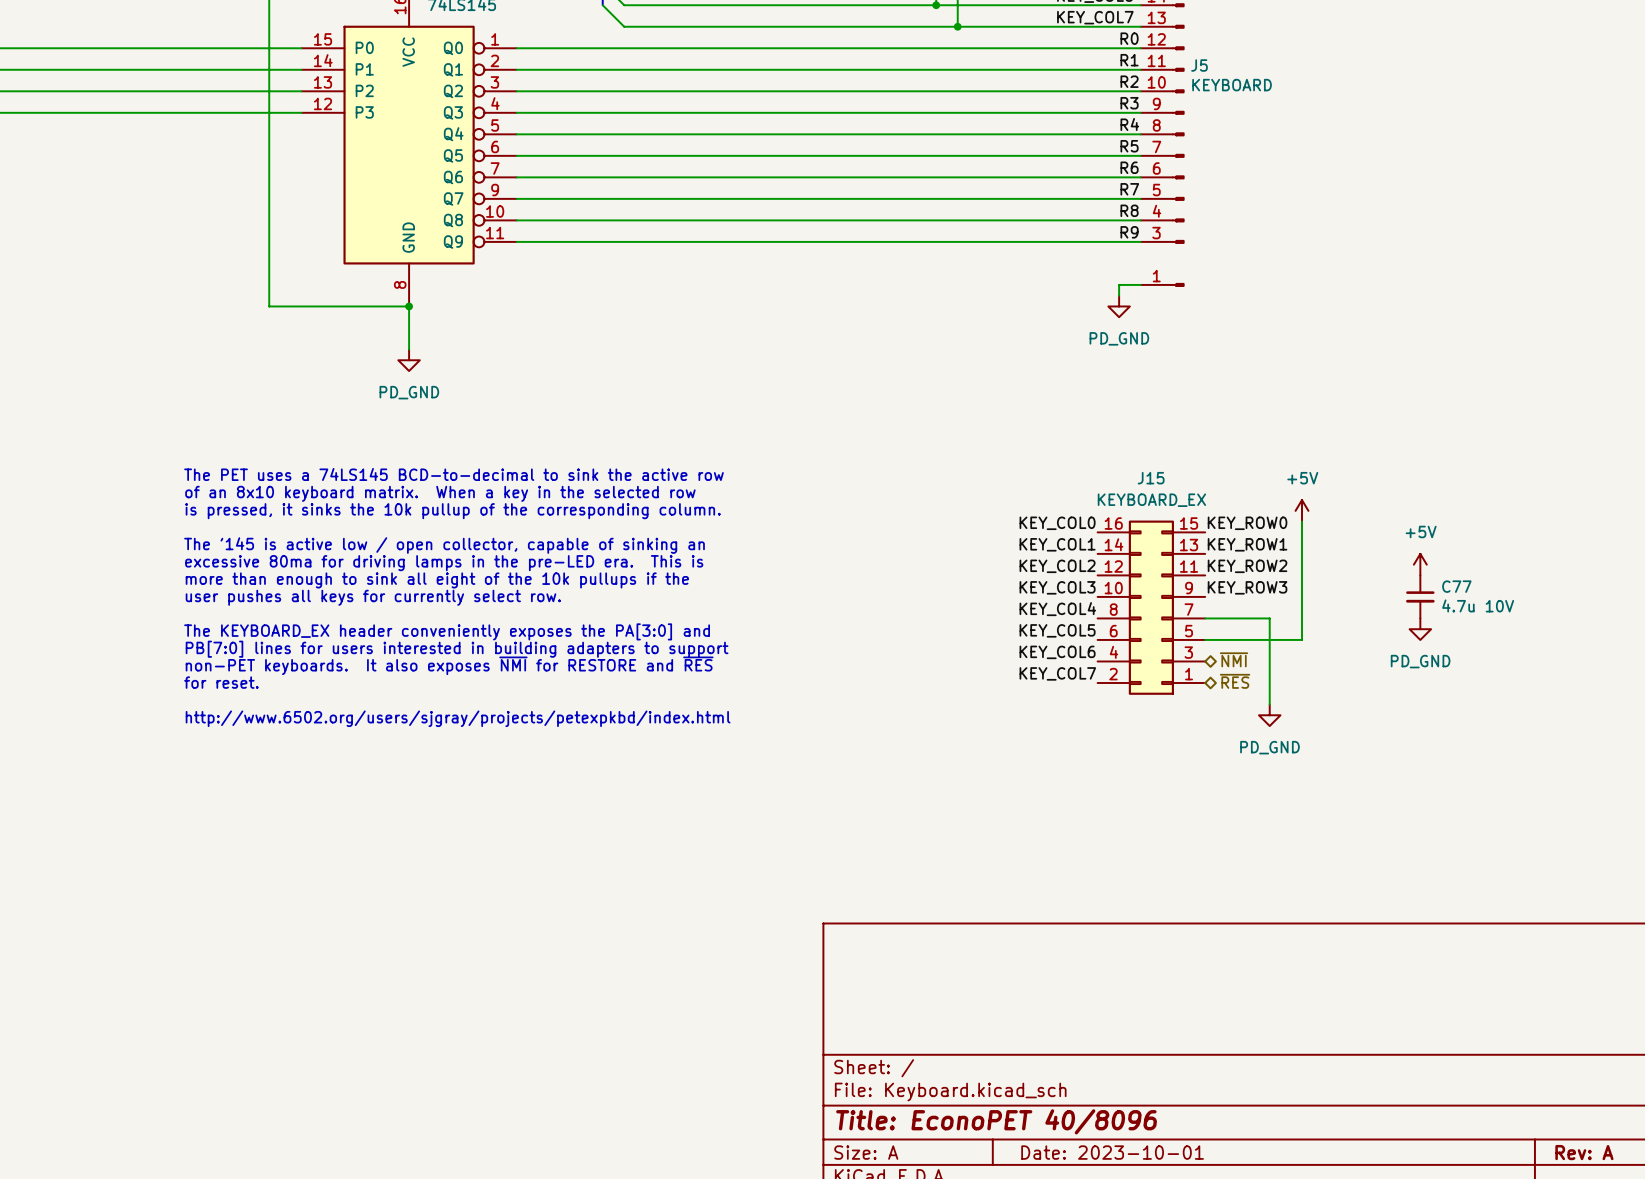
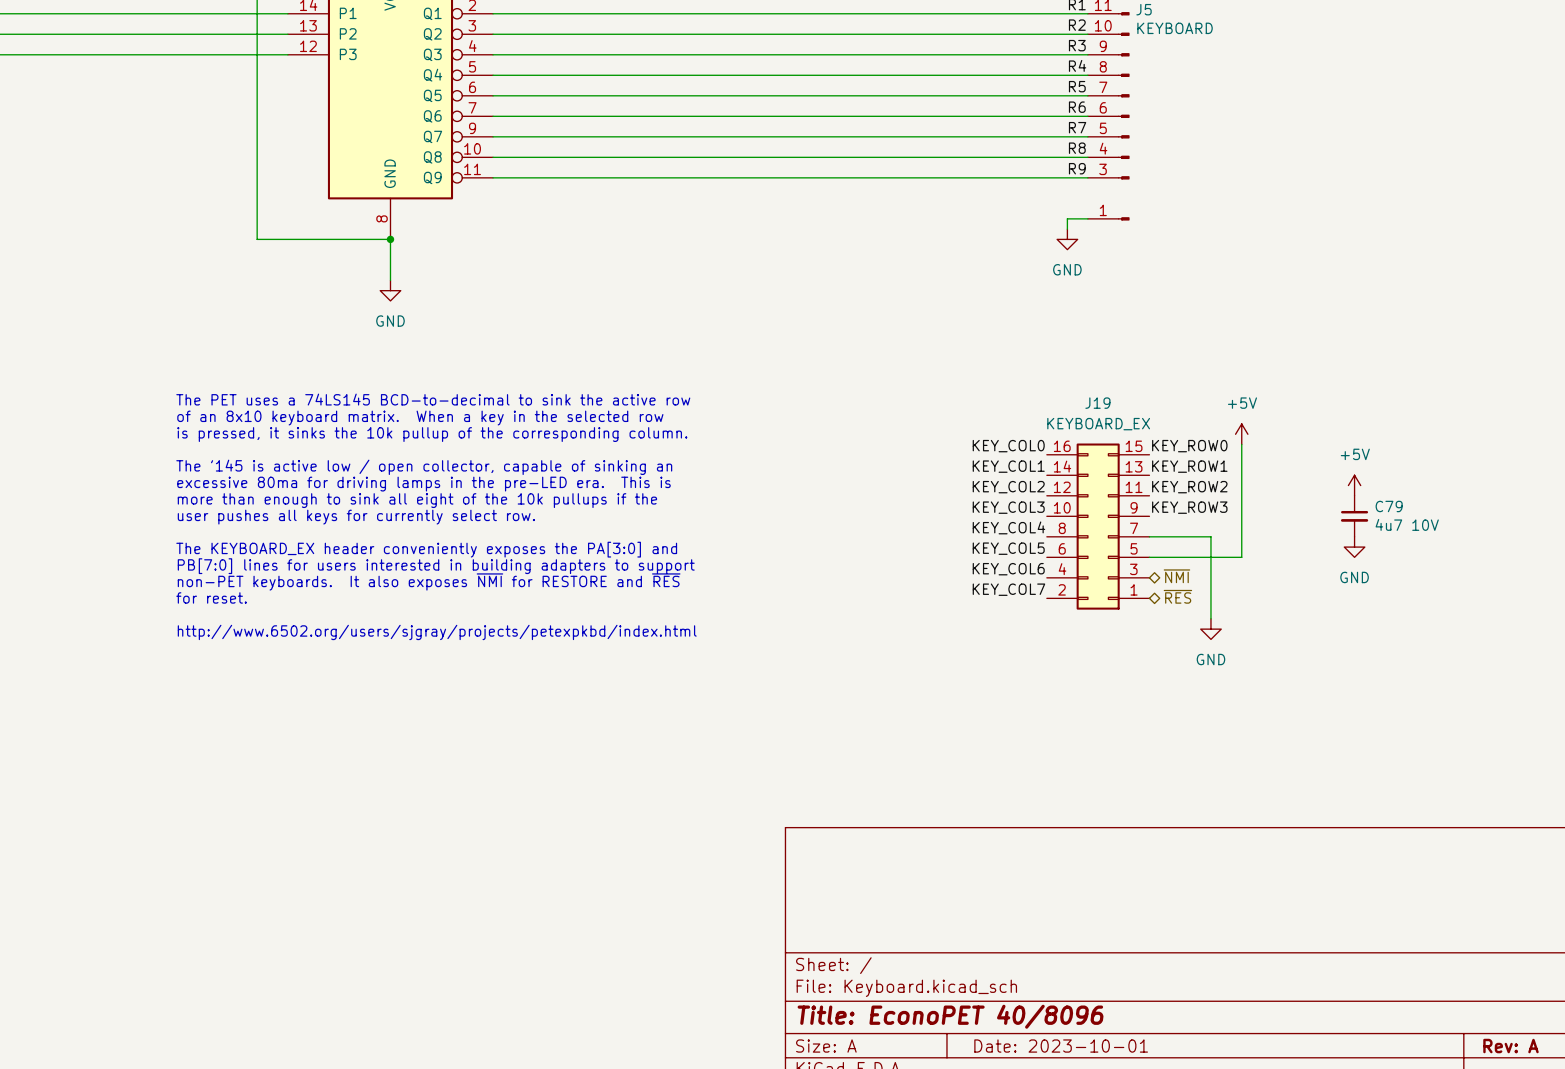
power symbol: PD_GND (1119, 306) -> GND (1067, 239)
power symbol: PD_GND (409, 360) -> GND (390, 290)
J15 name: J15 (1151, 478) -> J19 (1097, 403)
C77 name: C77 (1456, 586) -> C79 (1389, 506)
C77 value: 4.7u 10V (1478, 605) -> 4u7 10V (1407, 524)
power symbol: PD_GND (1420, 629) -> GND (1354, 547)
power symbol: PD_GND (1269, 715) -> GND (1210, 629)

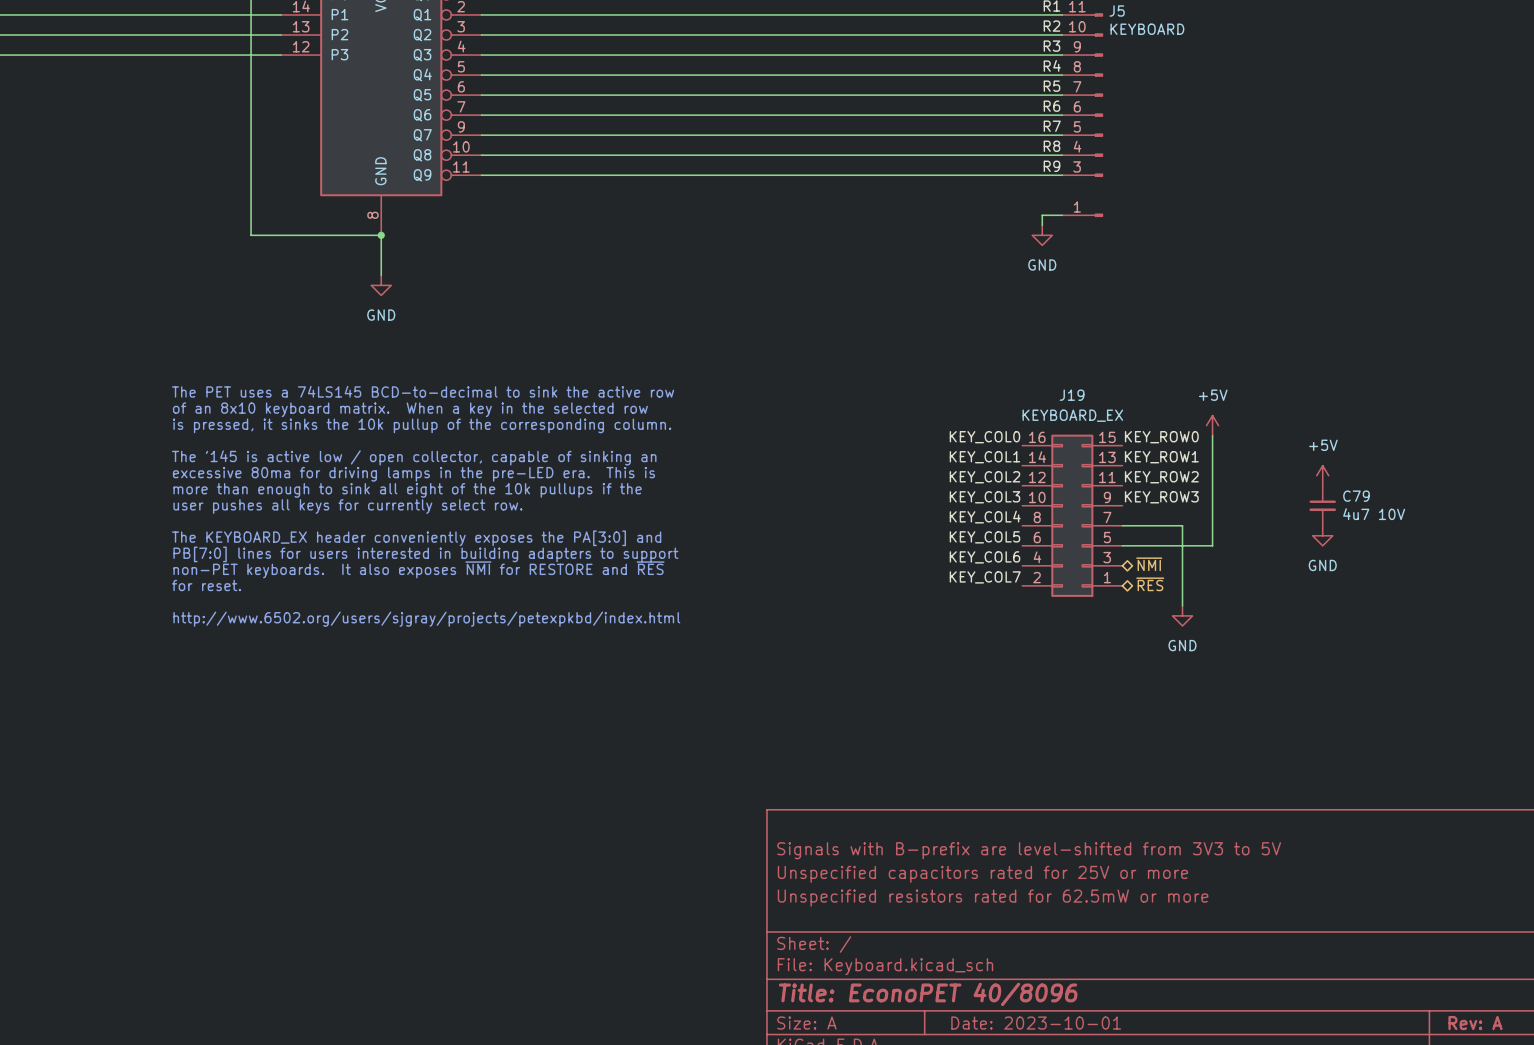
title block: none -> Signals with B-prefix are level-shifted from 3V3 to 5V (1029, 850)
title block: none -> Unspecified capacitors rated for 25V or more (982, 874)
title block: none -> Unspecified resistors rated for 62.5mW or more (993, 898)

